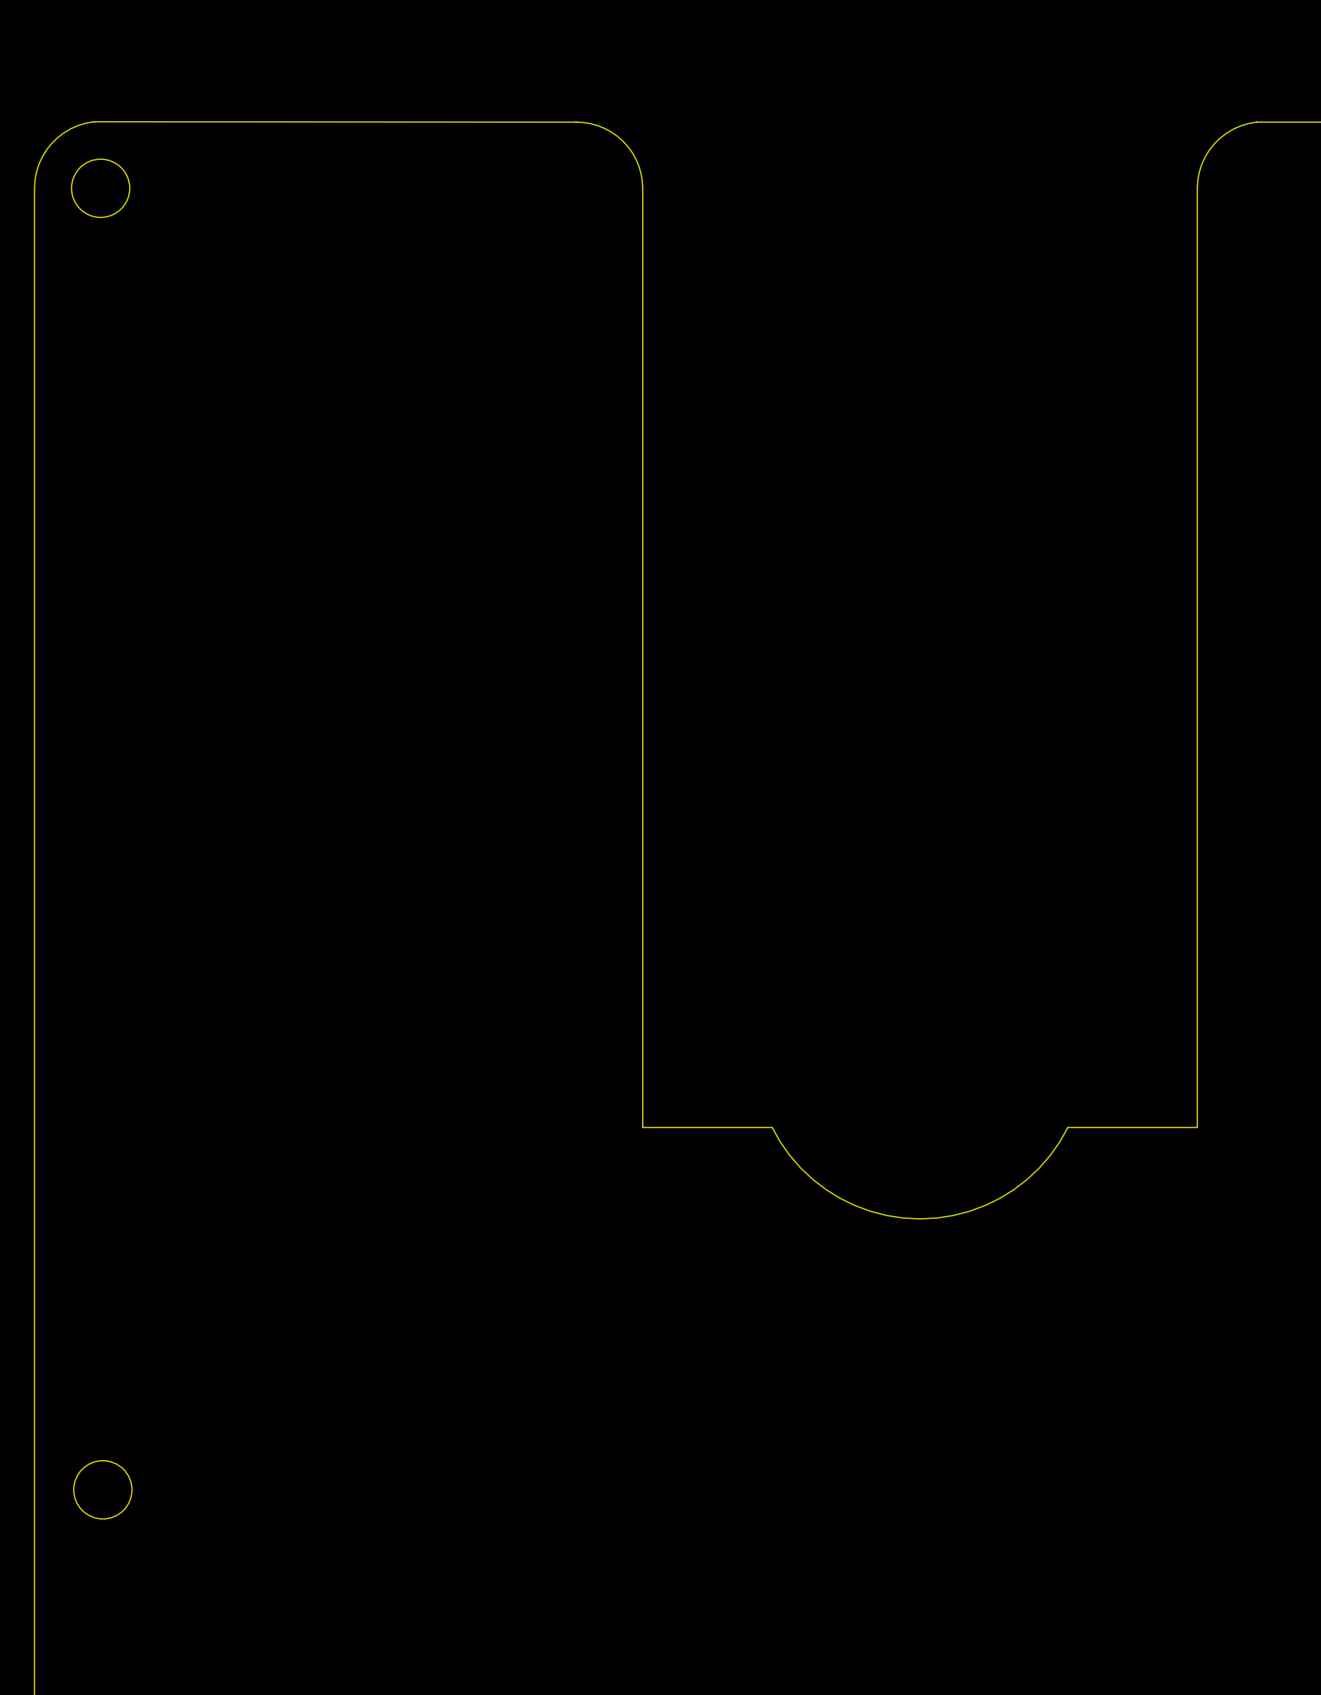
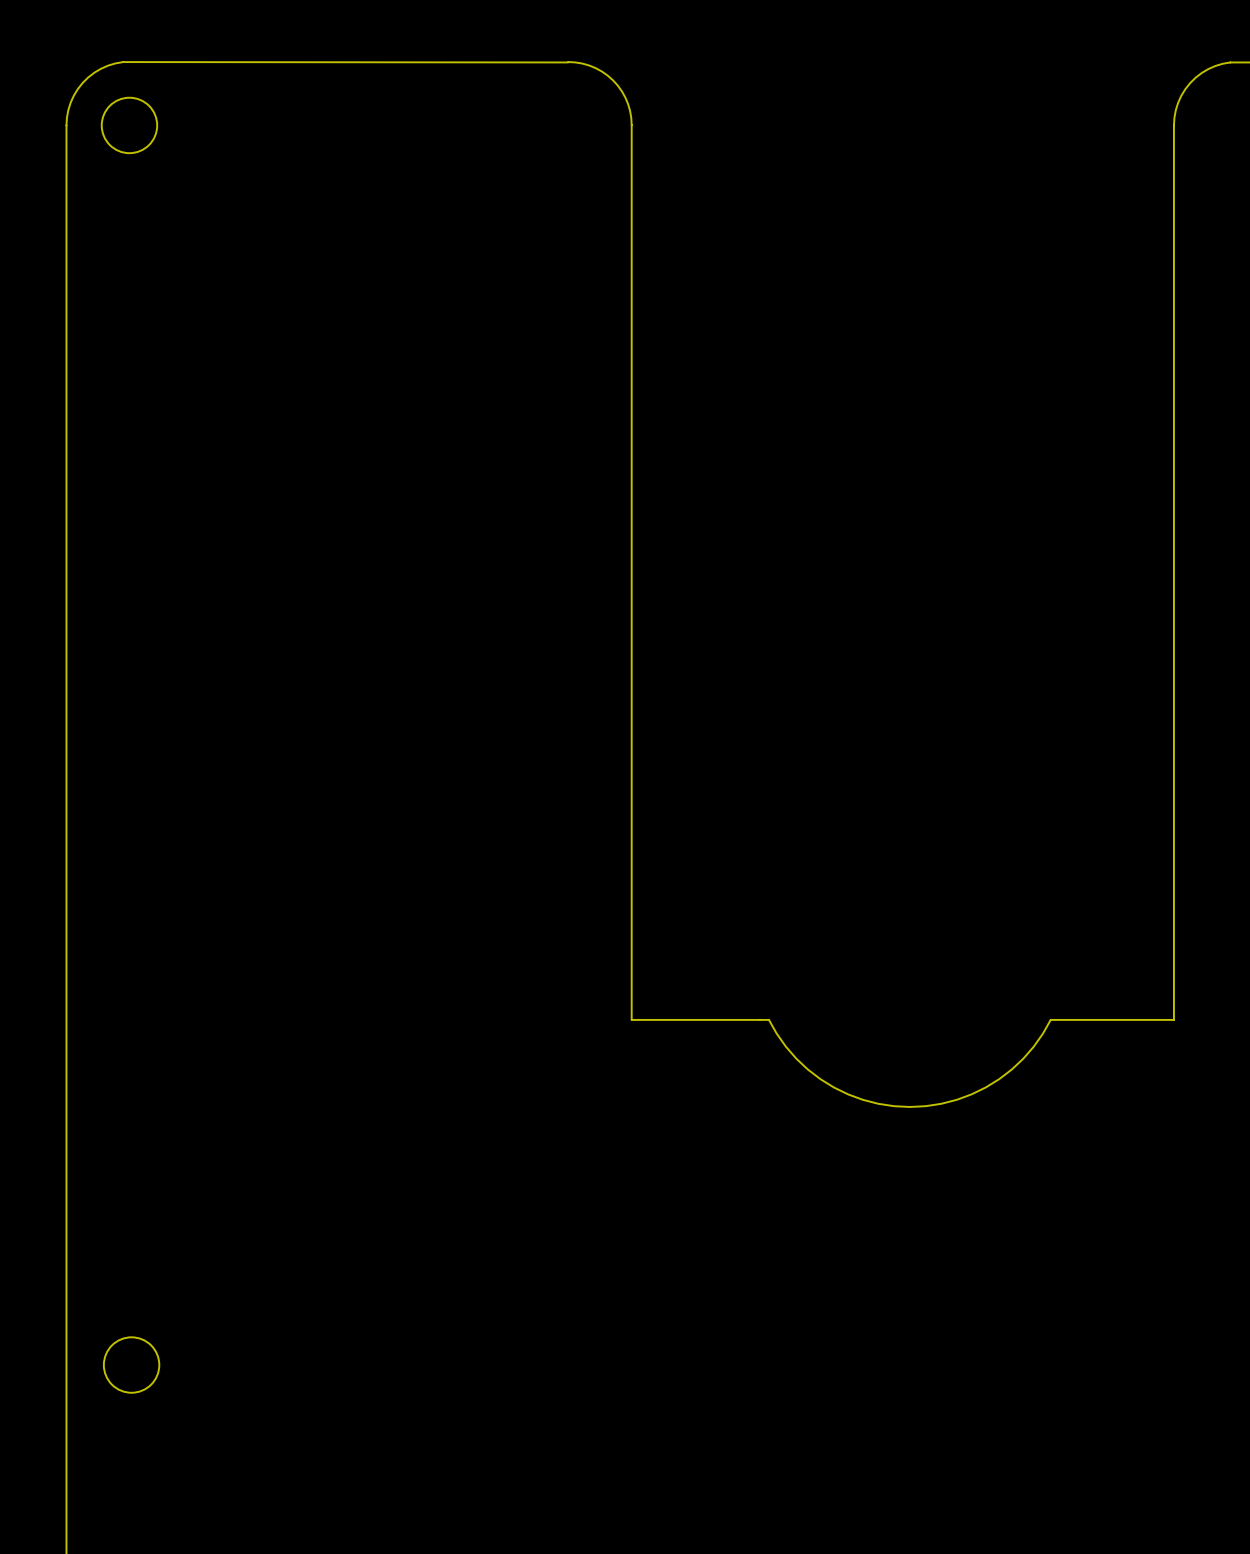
board edge: (561, 122) (590, 123) (604, 128) (617, 136) (628, 146) (636, 159) (642, 180) (642, 1127) -> (568, 62) (589, 65) (607, 75) (617, 85) (625, 97) (631, 117) (631, 1019)
board edge: none -> (631, 1019) (645, 1019)

